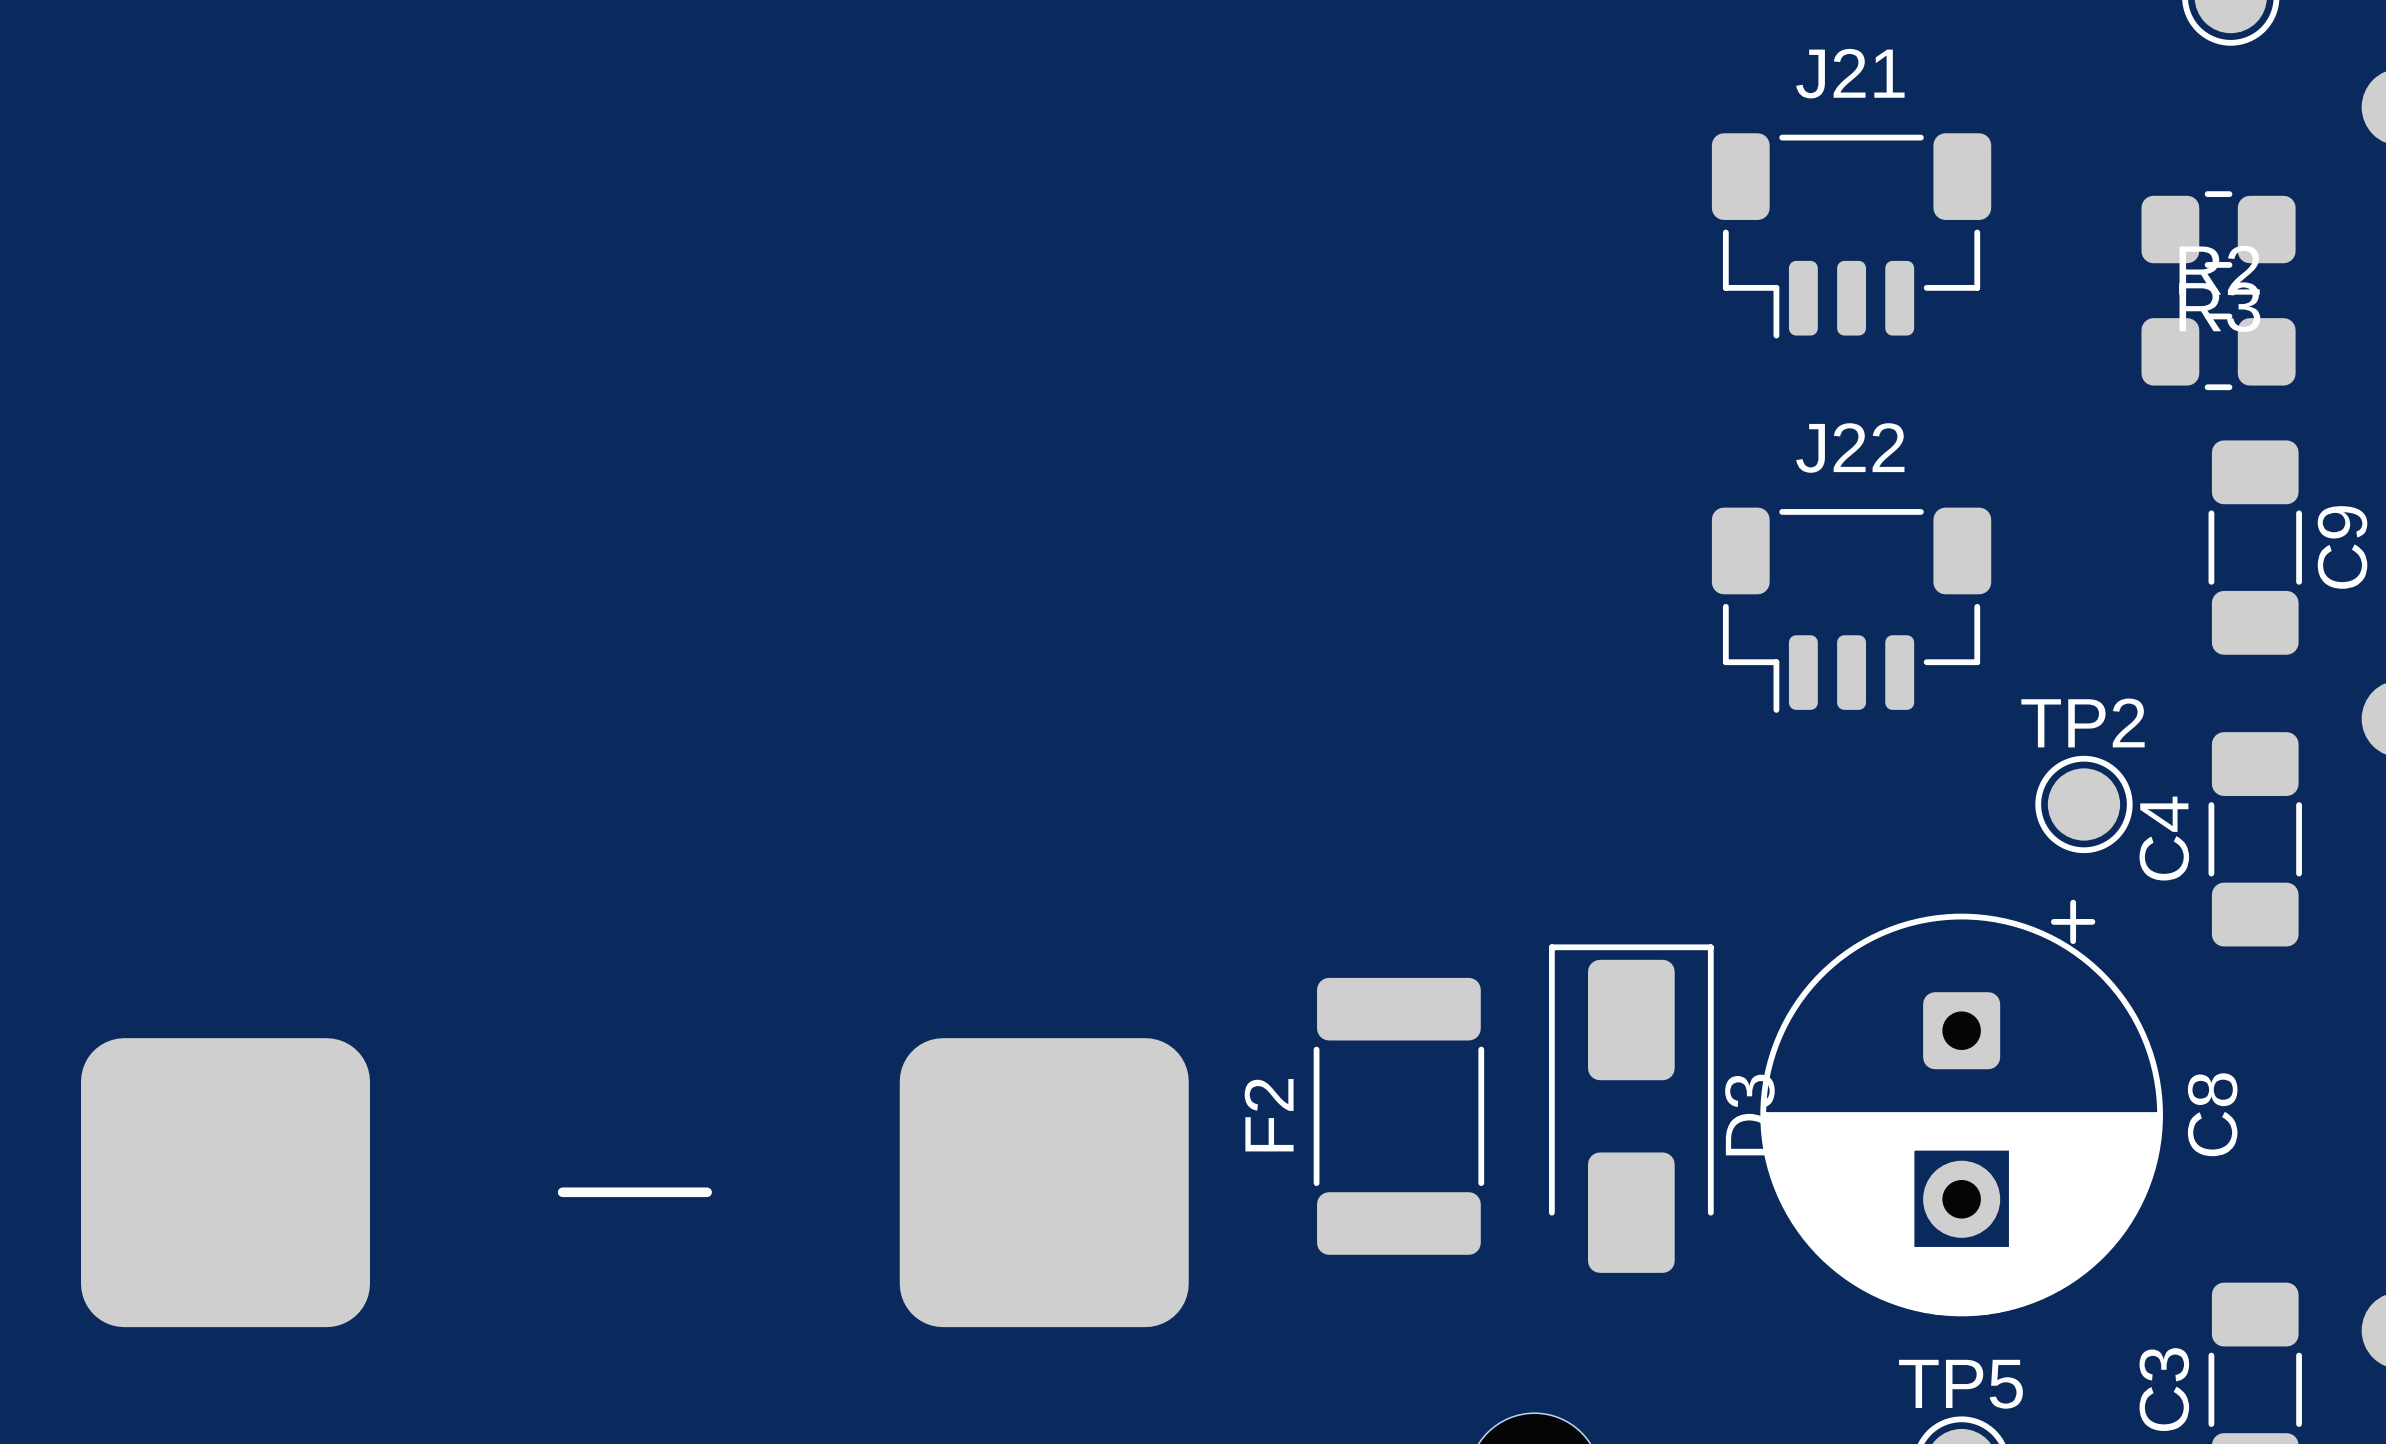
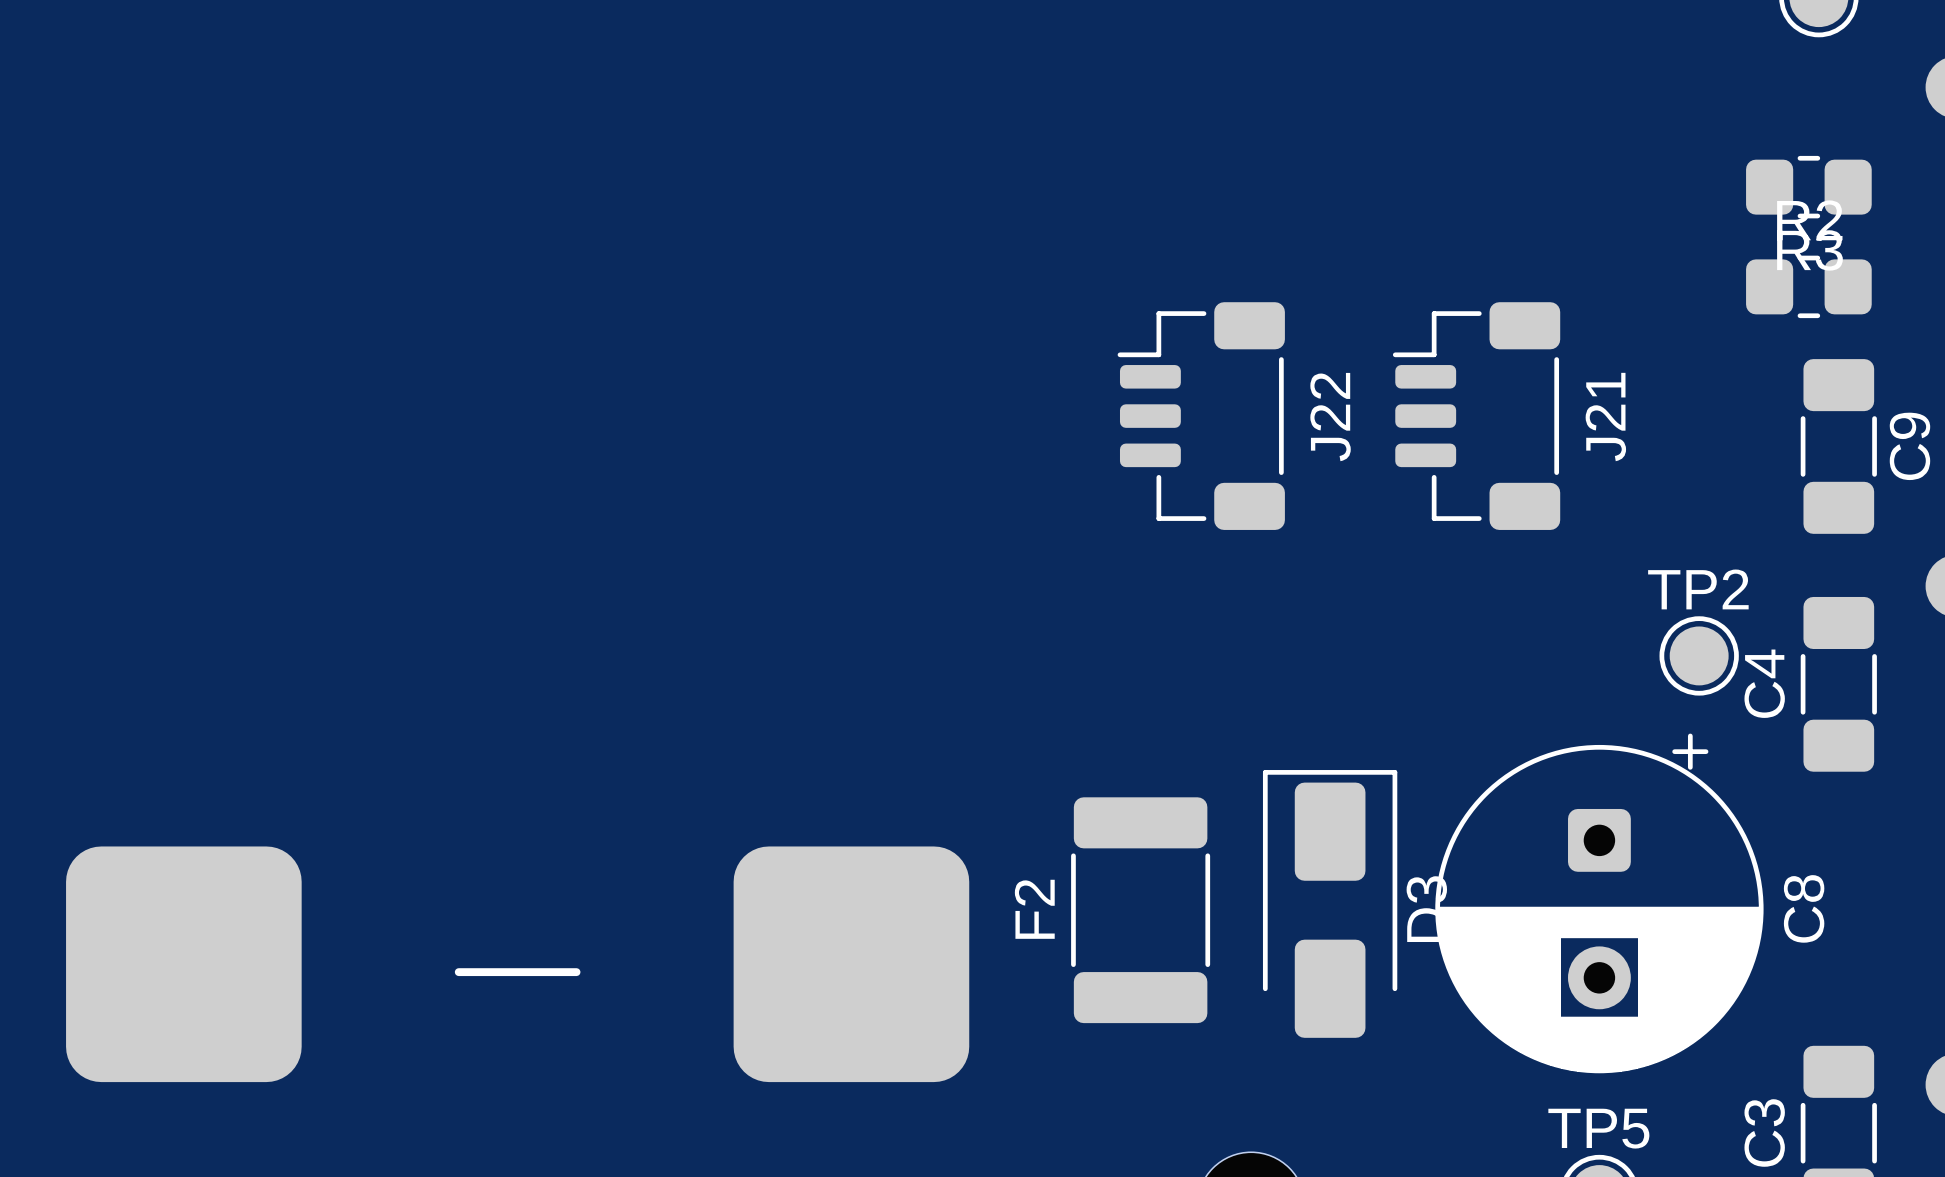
J21 rotation: 0° (1851, 235) -> 90° clockwise (1476, 416)
J21 position: (1851, 235) -> (1476, 416)
J22 rotation: 0° (1851, 610) -> 90° clockwise (1201, 416)
J22 position: (1851, 610) -> (1201, 416)

